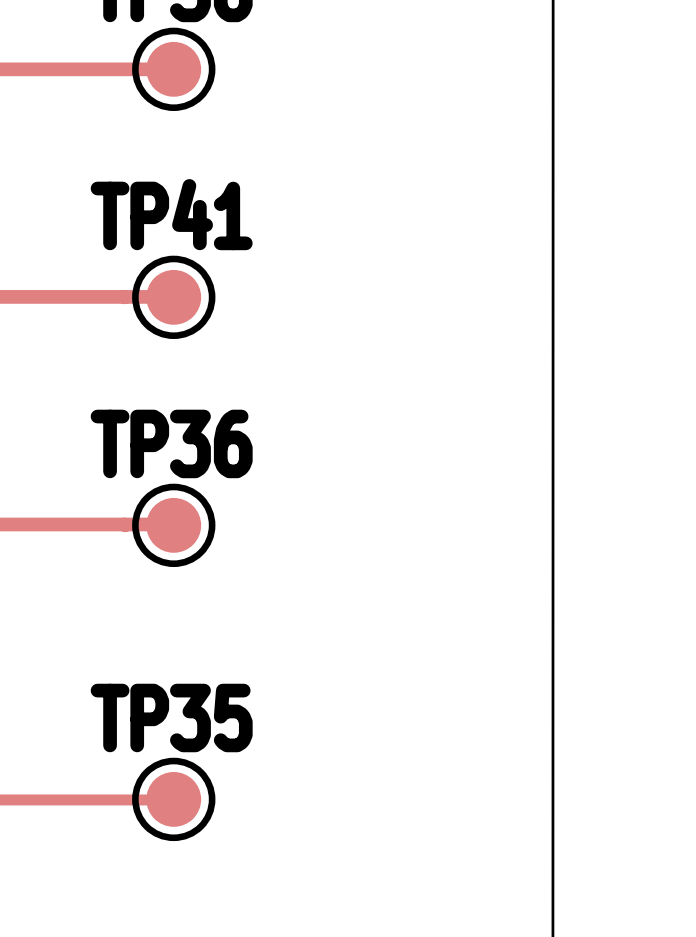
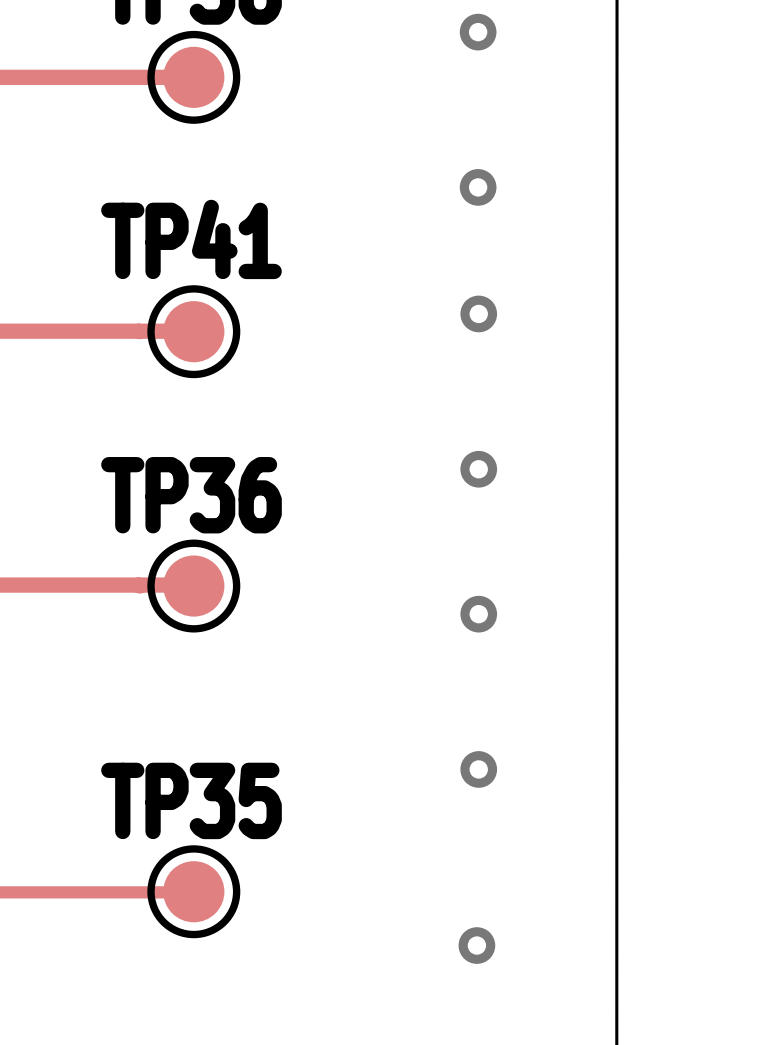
via: none -> (478, 32)
via: none -> (478, 187)
via: none -> (478, 313)
via: none -> (478, 469)
via: none -> (478, 614)
via: none -> (478, 769)
via: none -> (476, 945)

